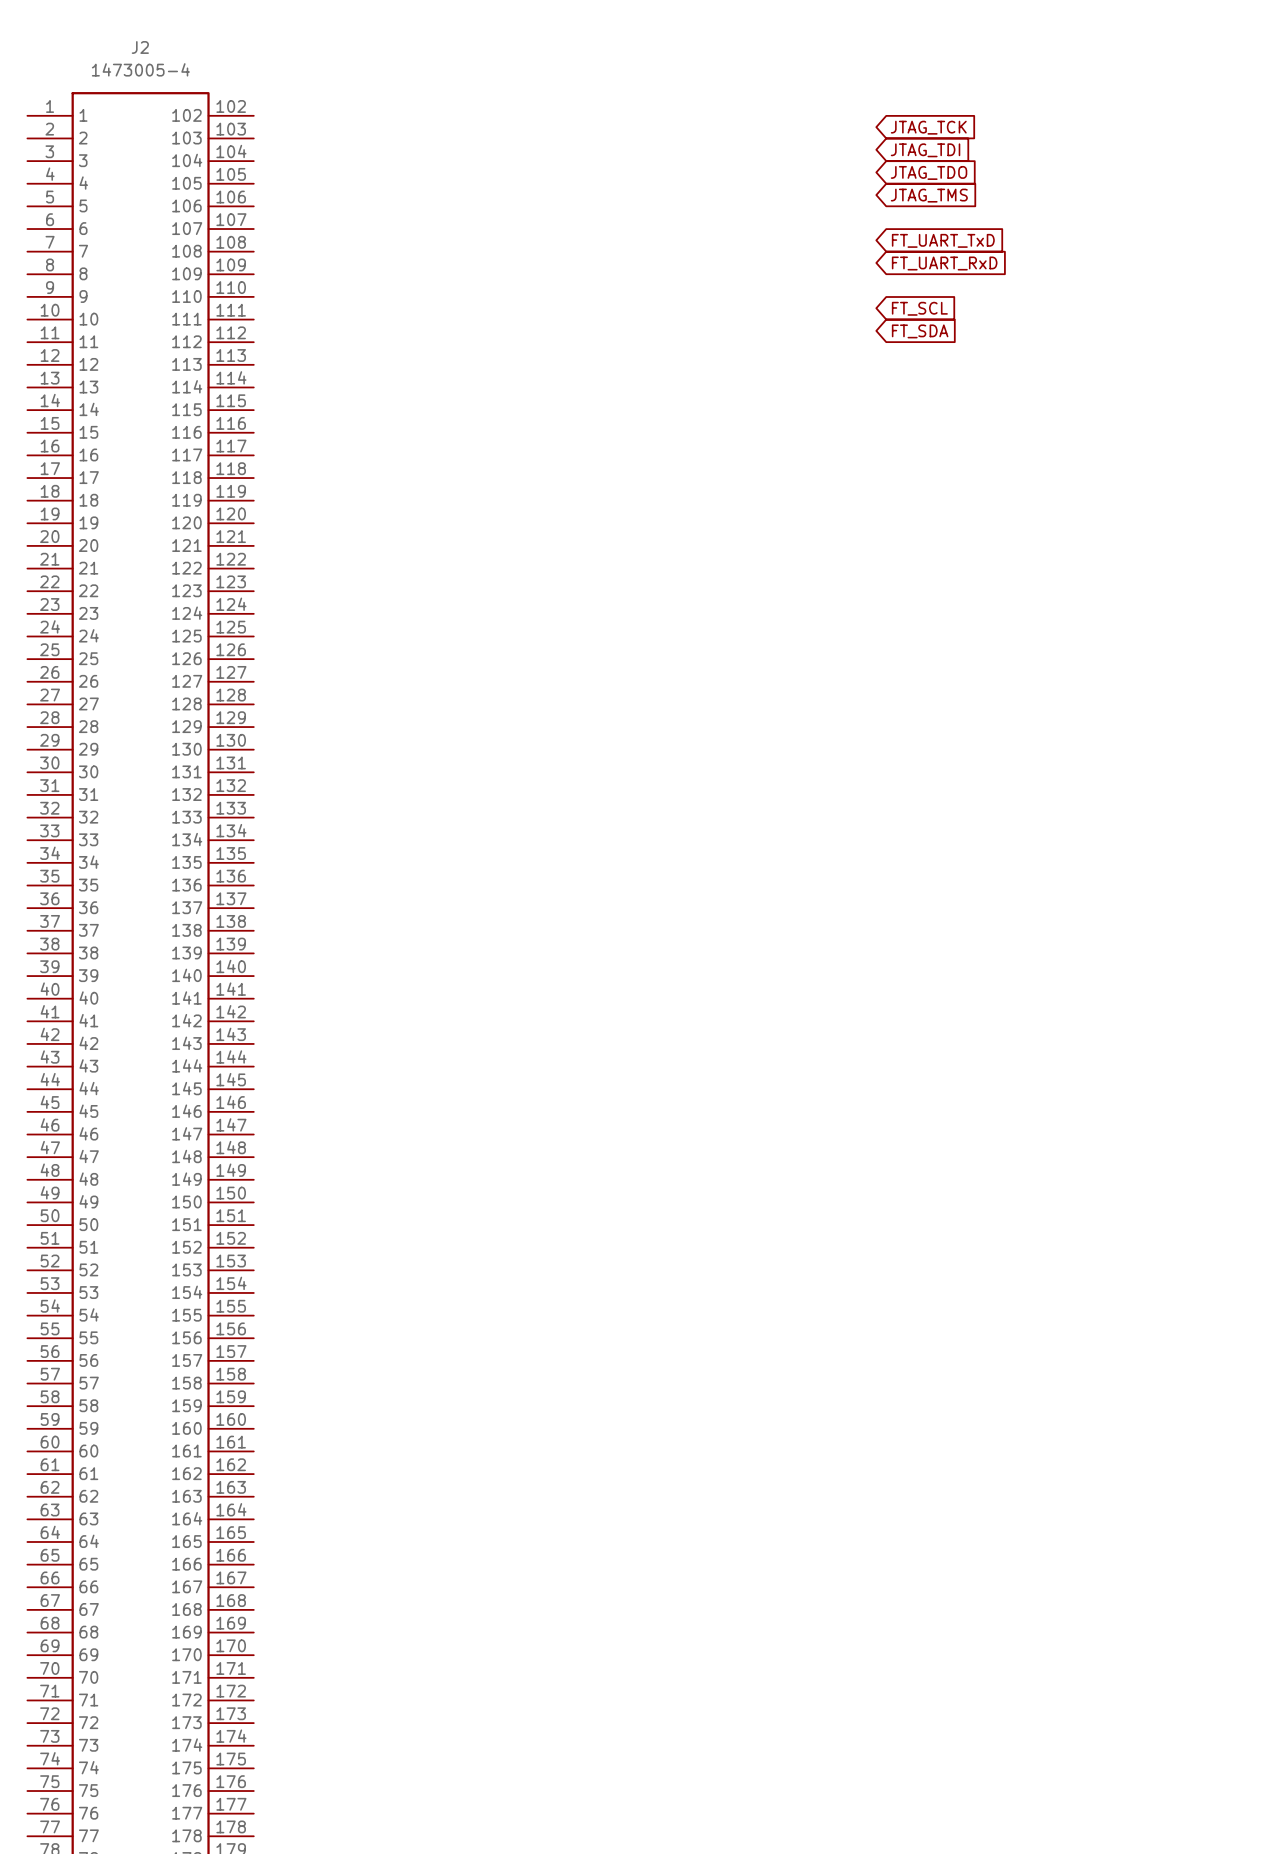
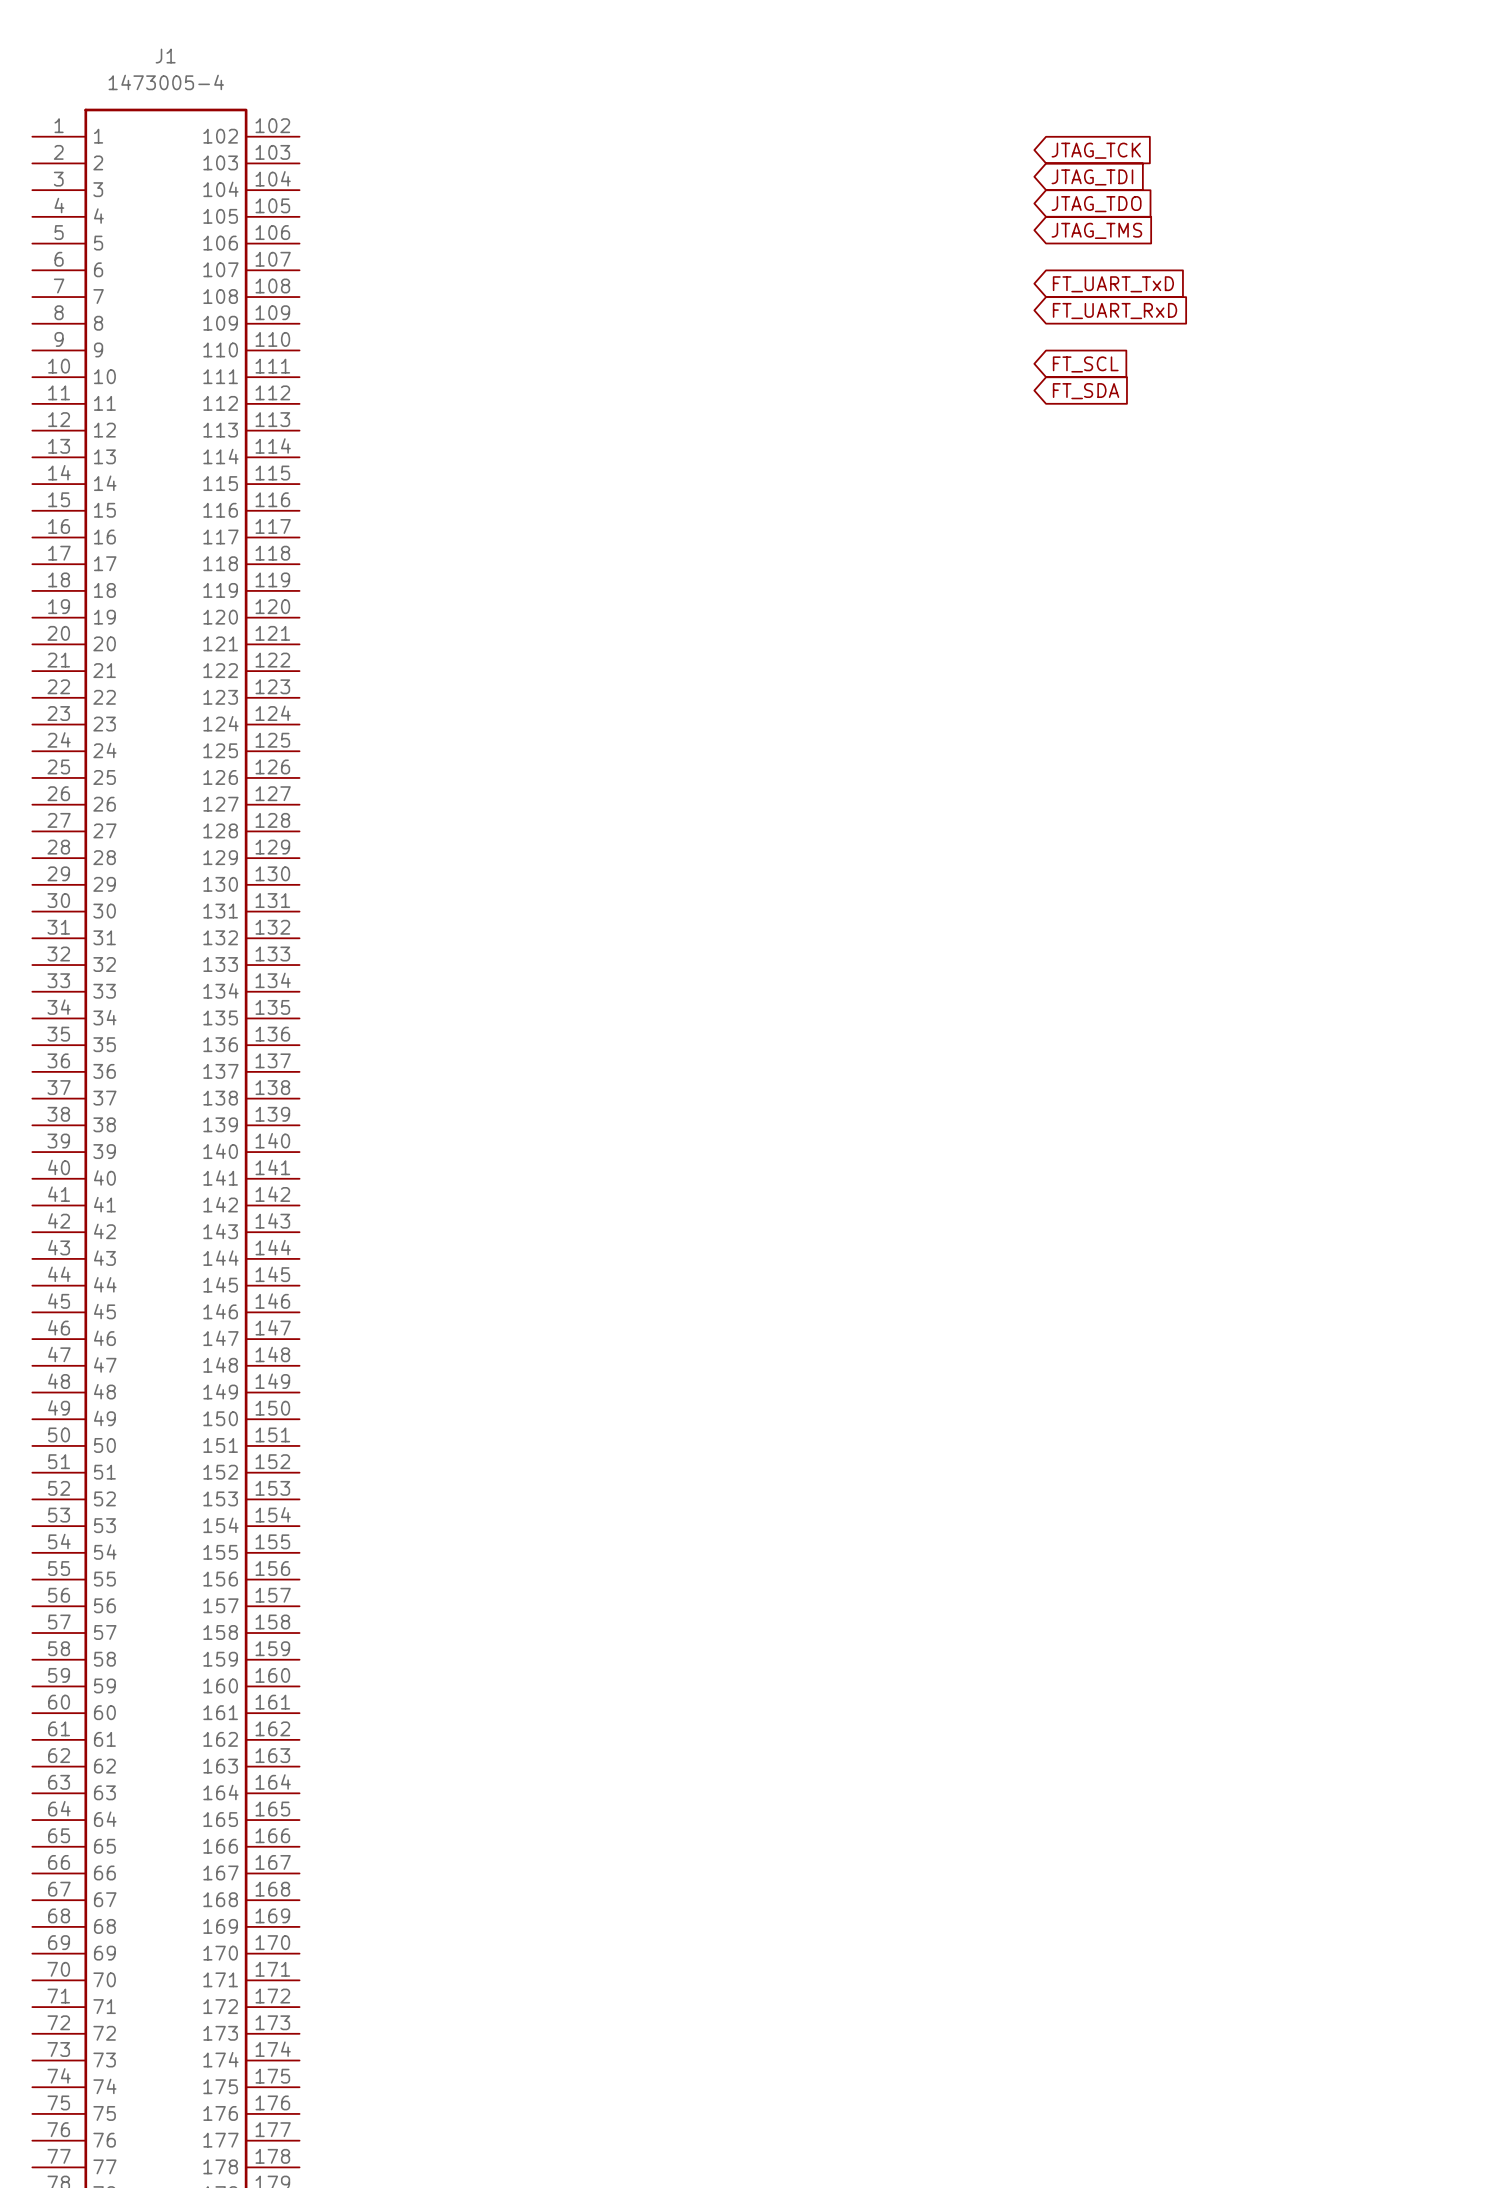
J2 name: J2 (140, 47) -> J1 (165, 56)

